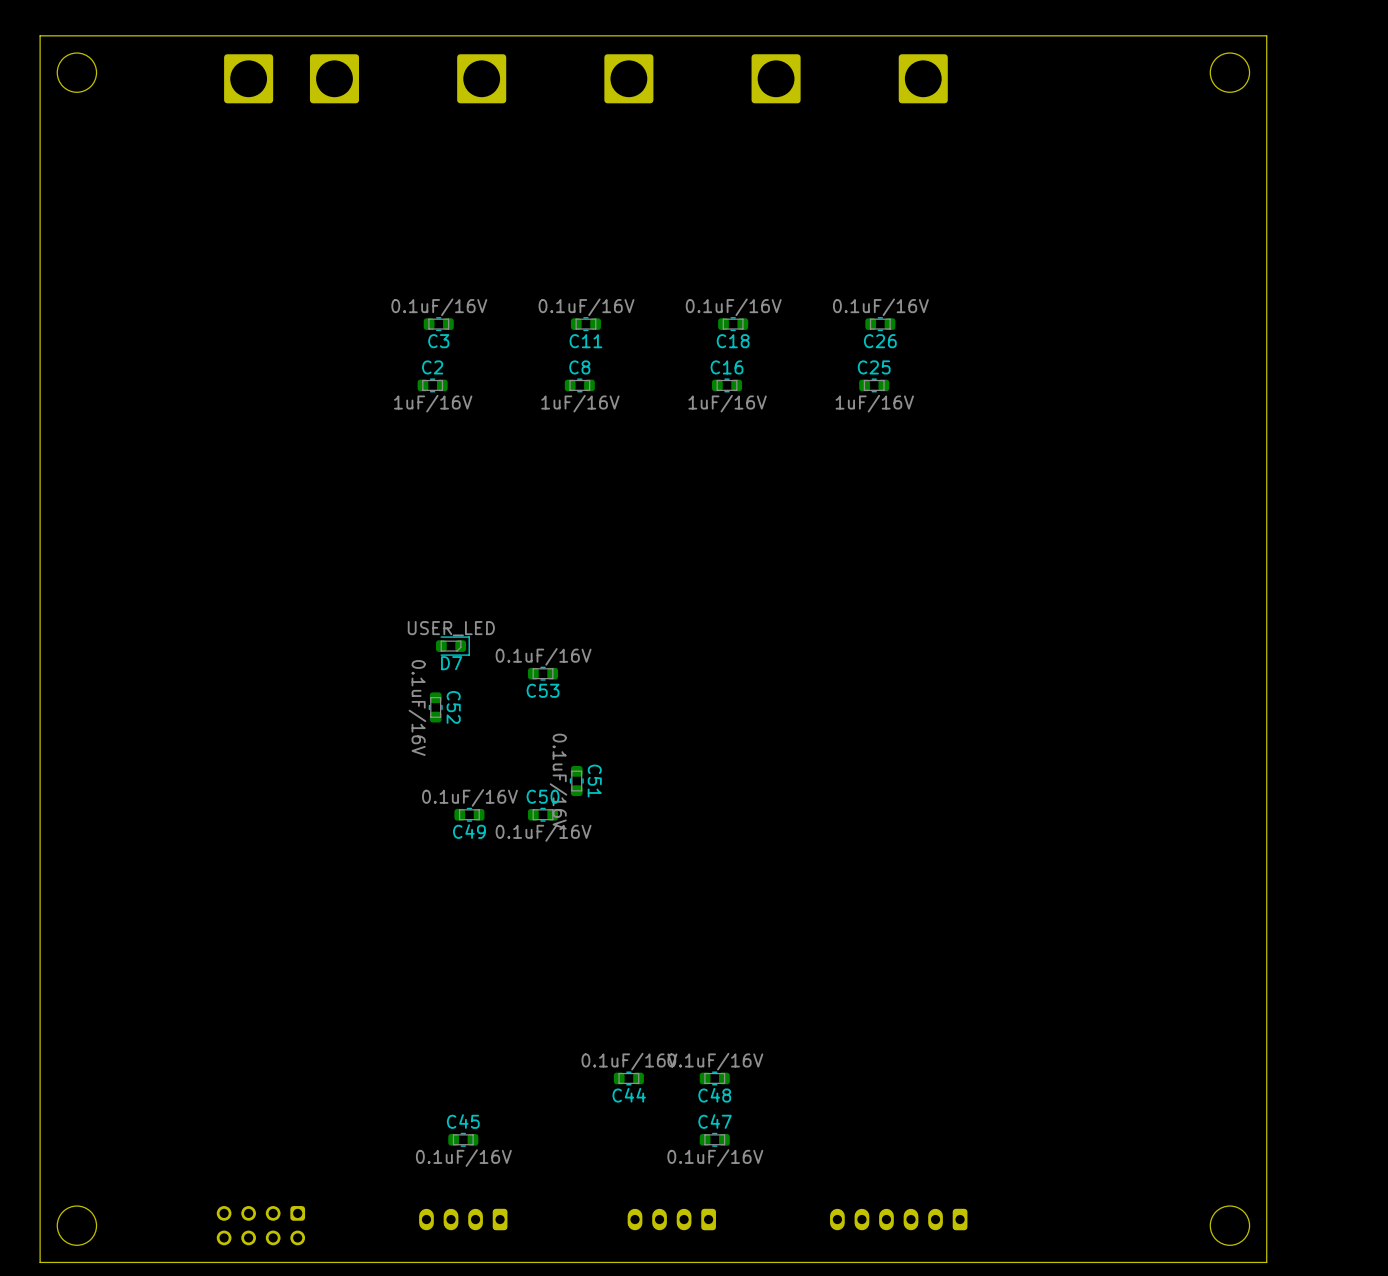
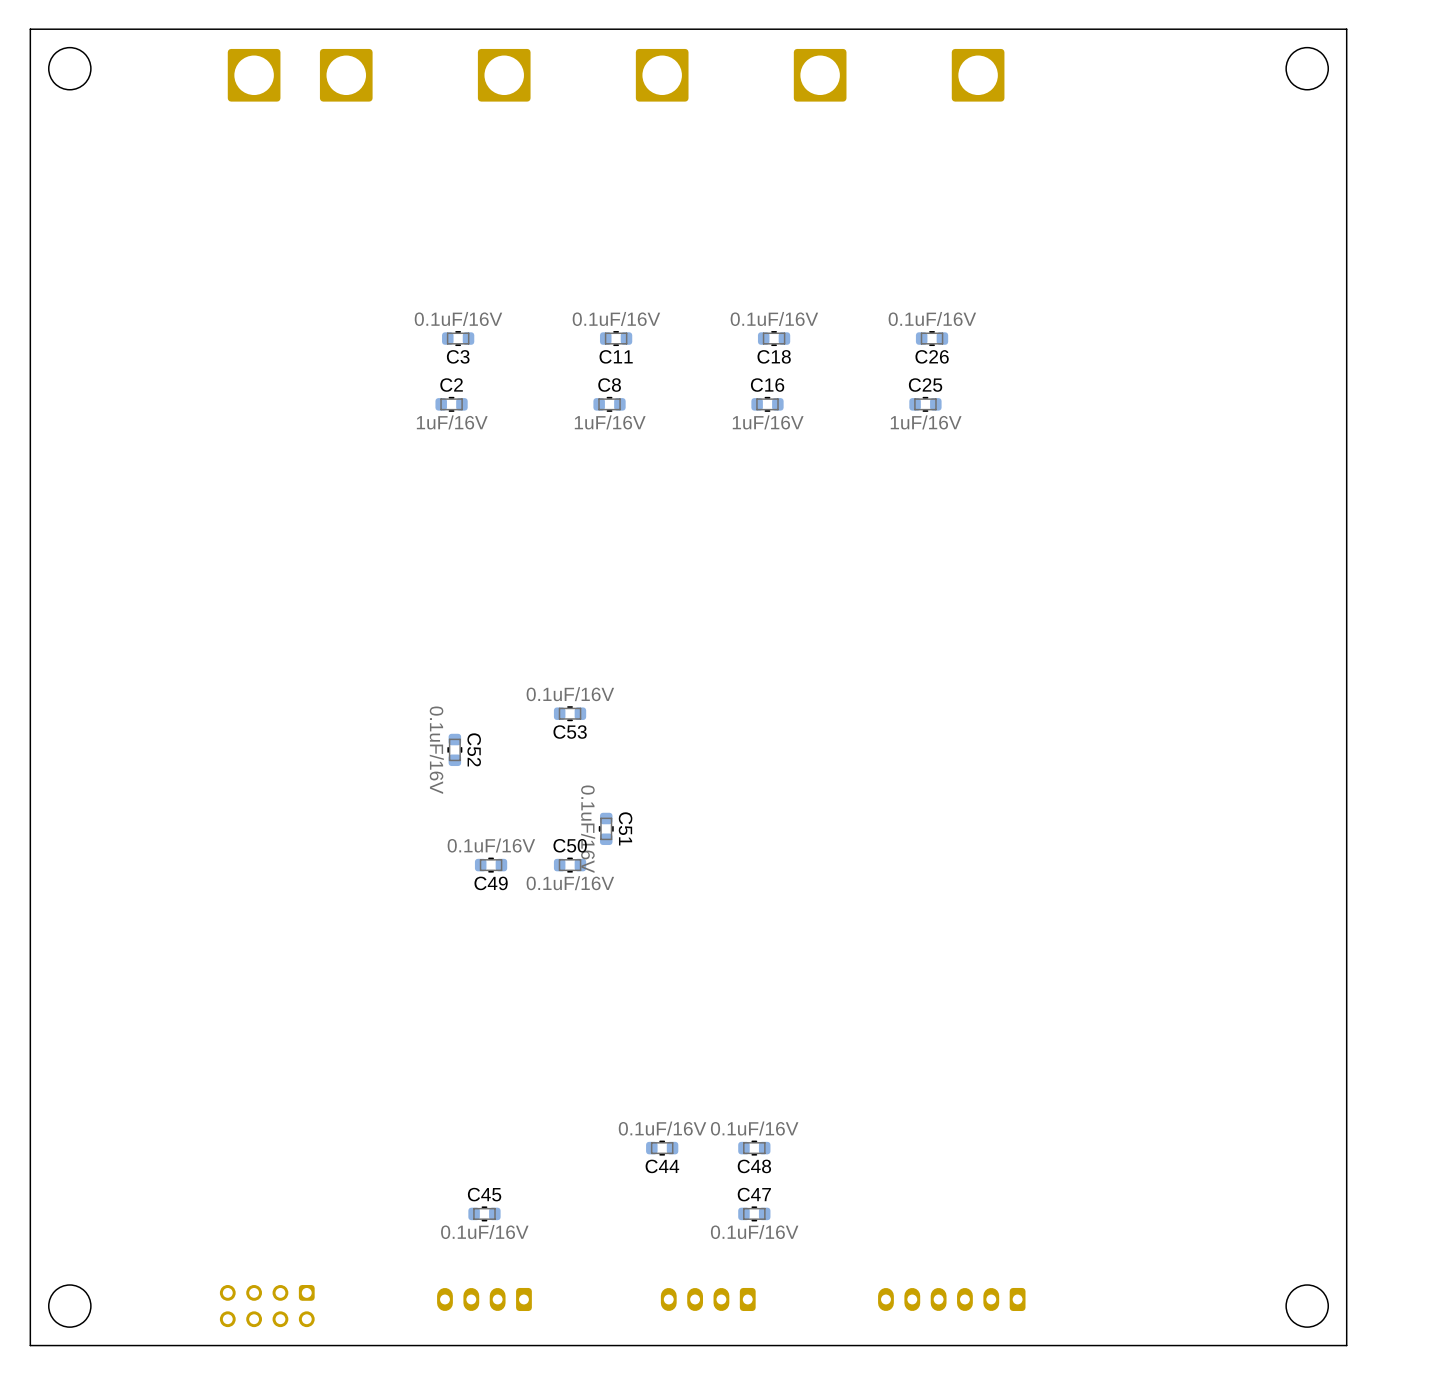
D7: USER_LED (452, 646) -> none

